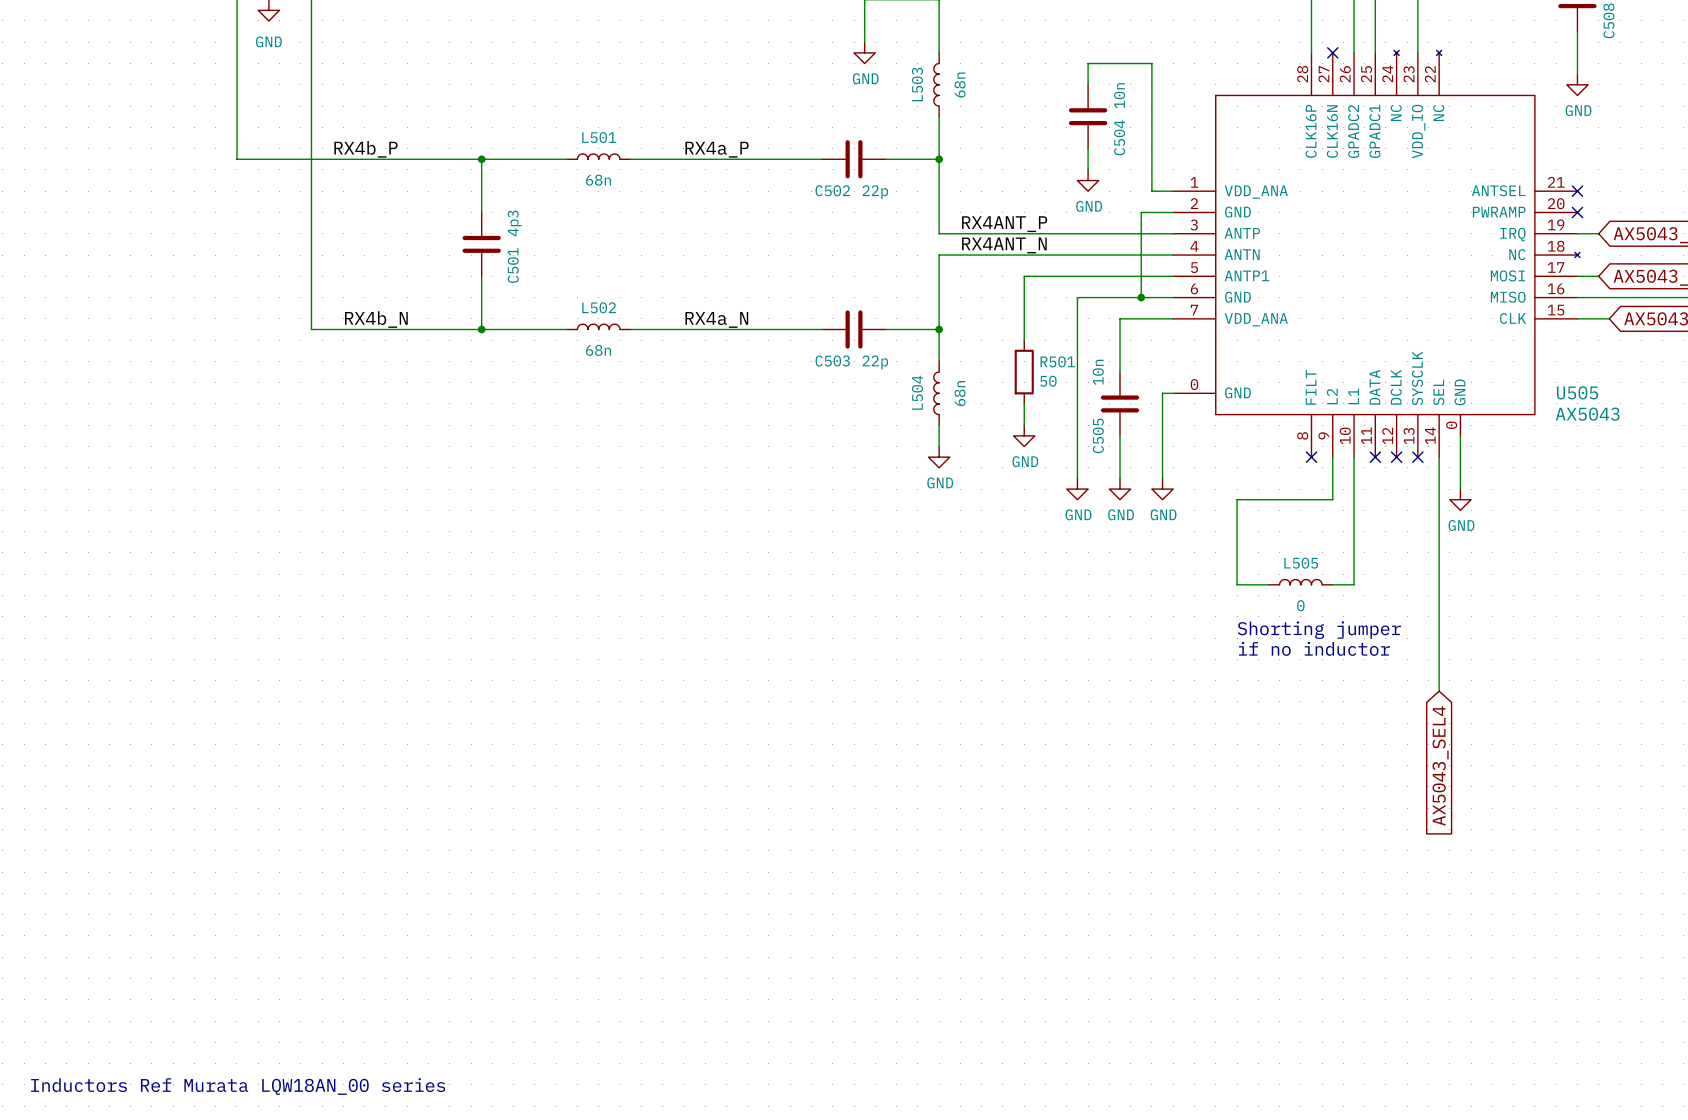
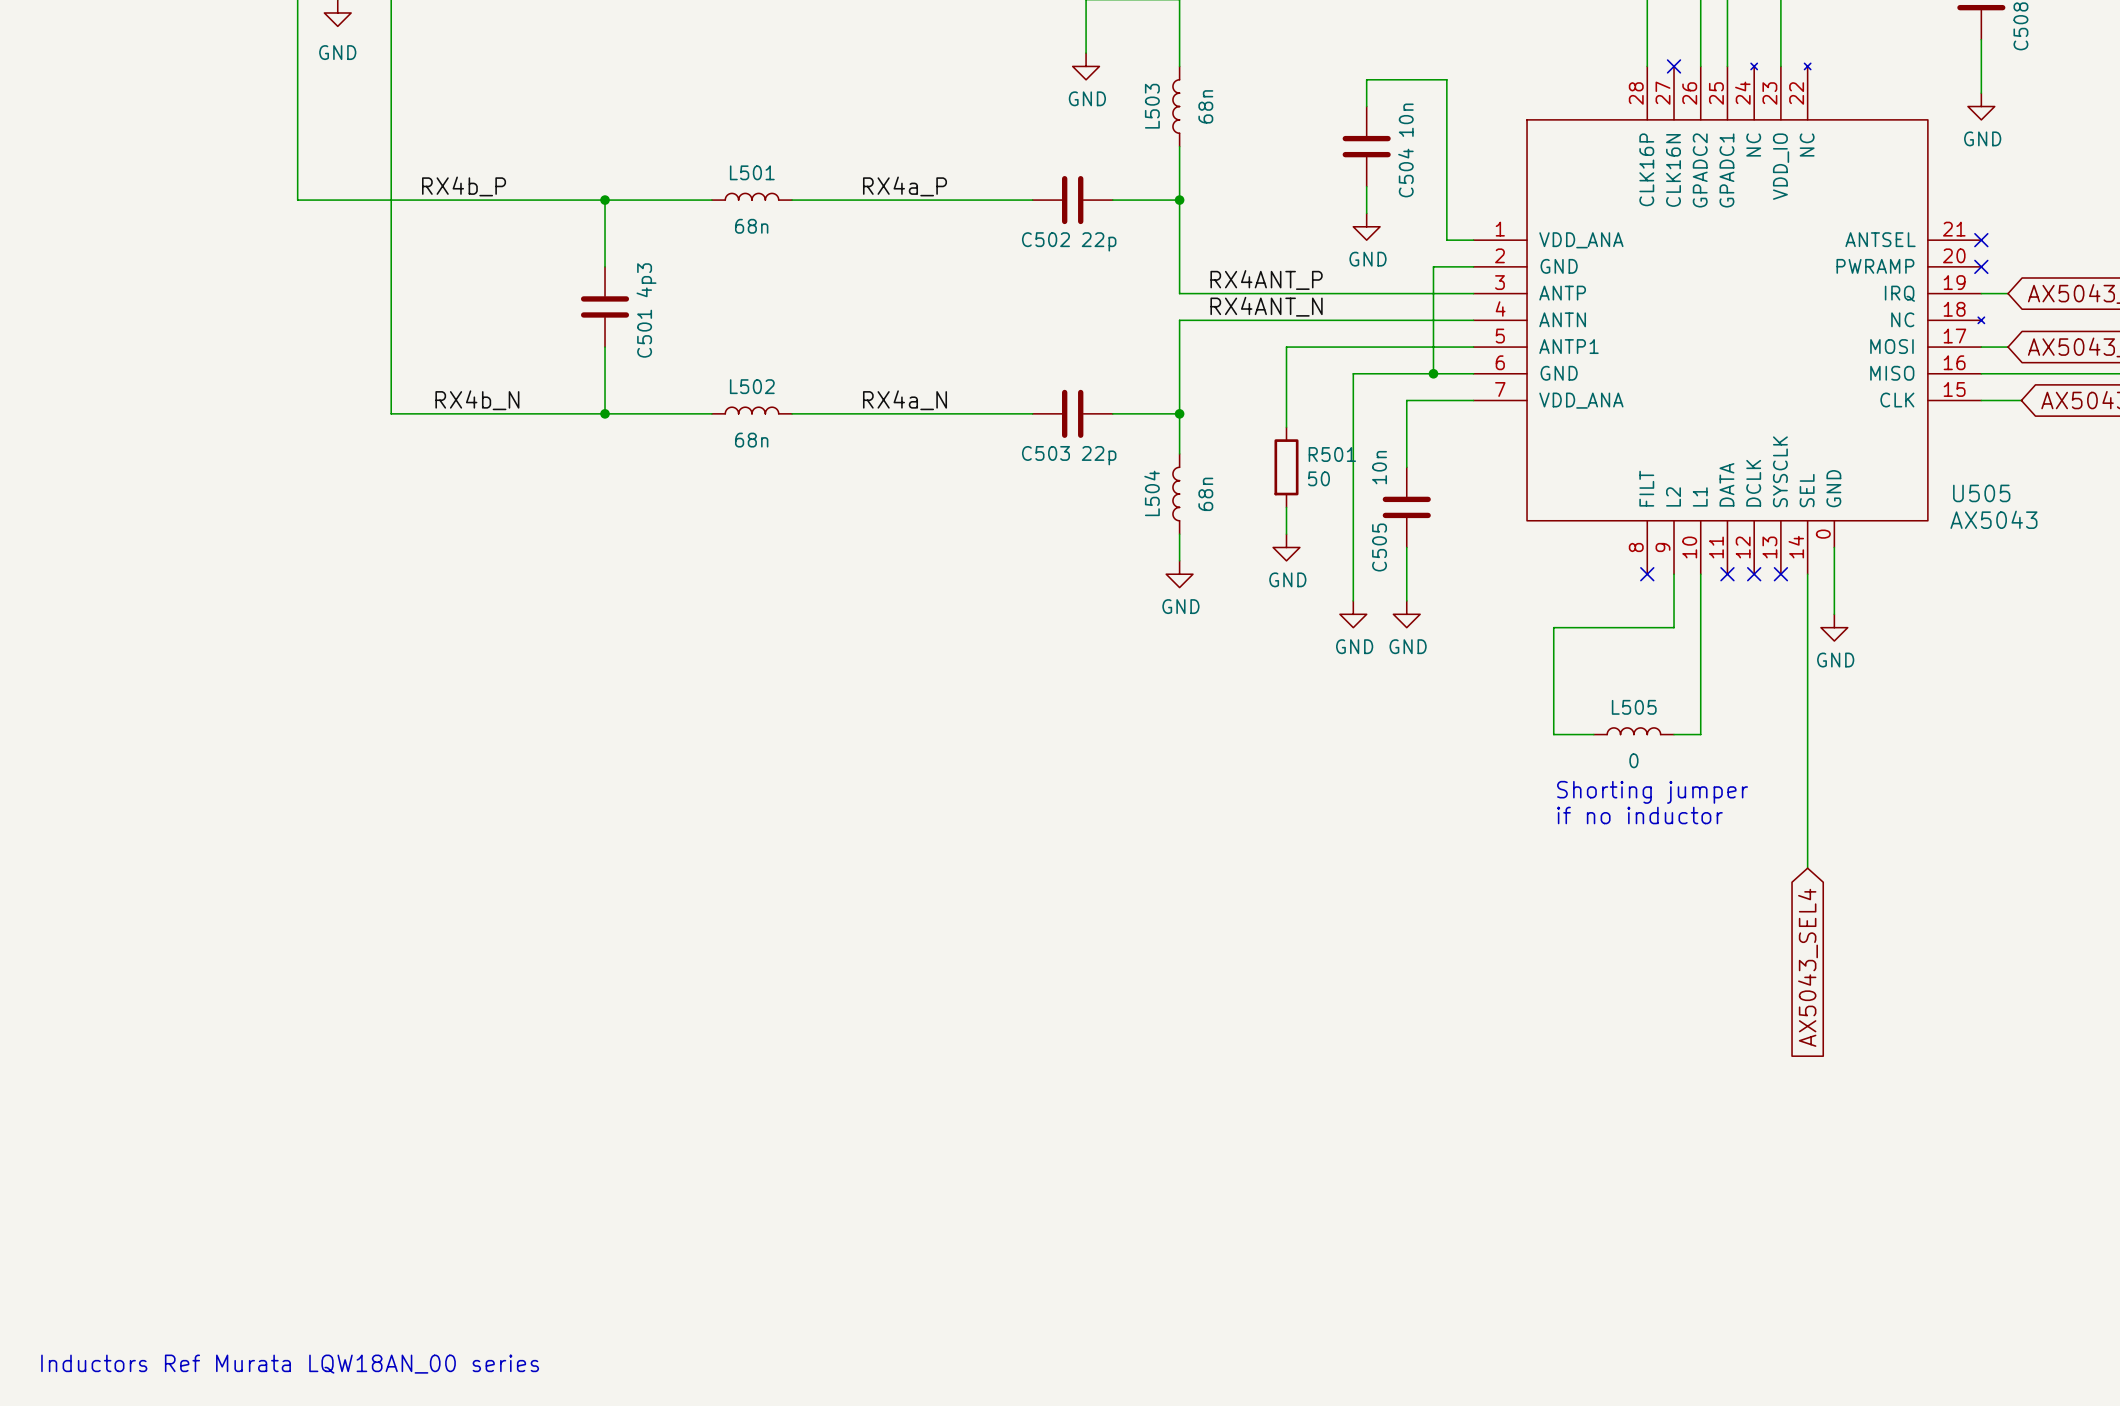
U505 symbol: [1173, 50, 1580, 458] -> [1473, 63, 1985, 575]
wire: (1173, 393) (1162, 393) (1162, 478) -> none
power symbol: GND (1162, 489) -> none

